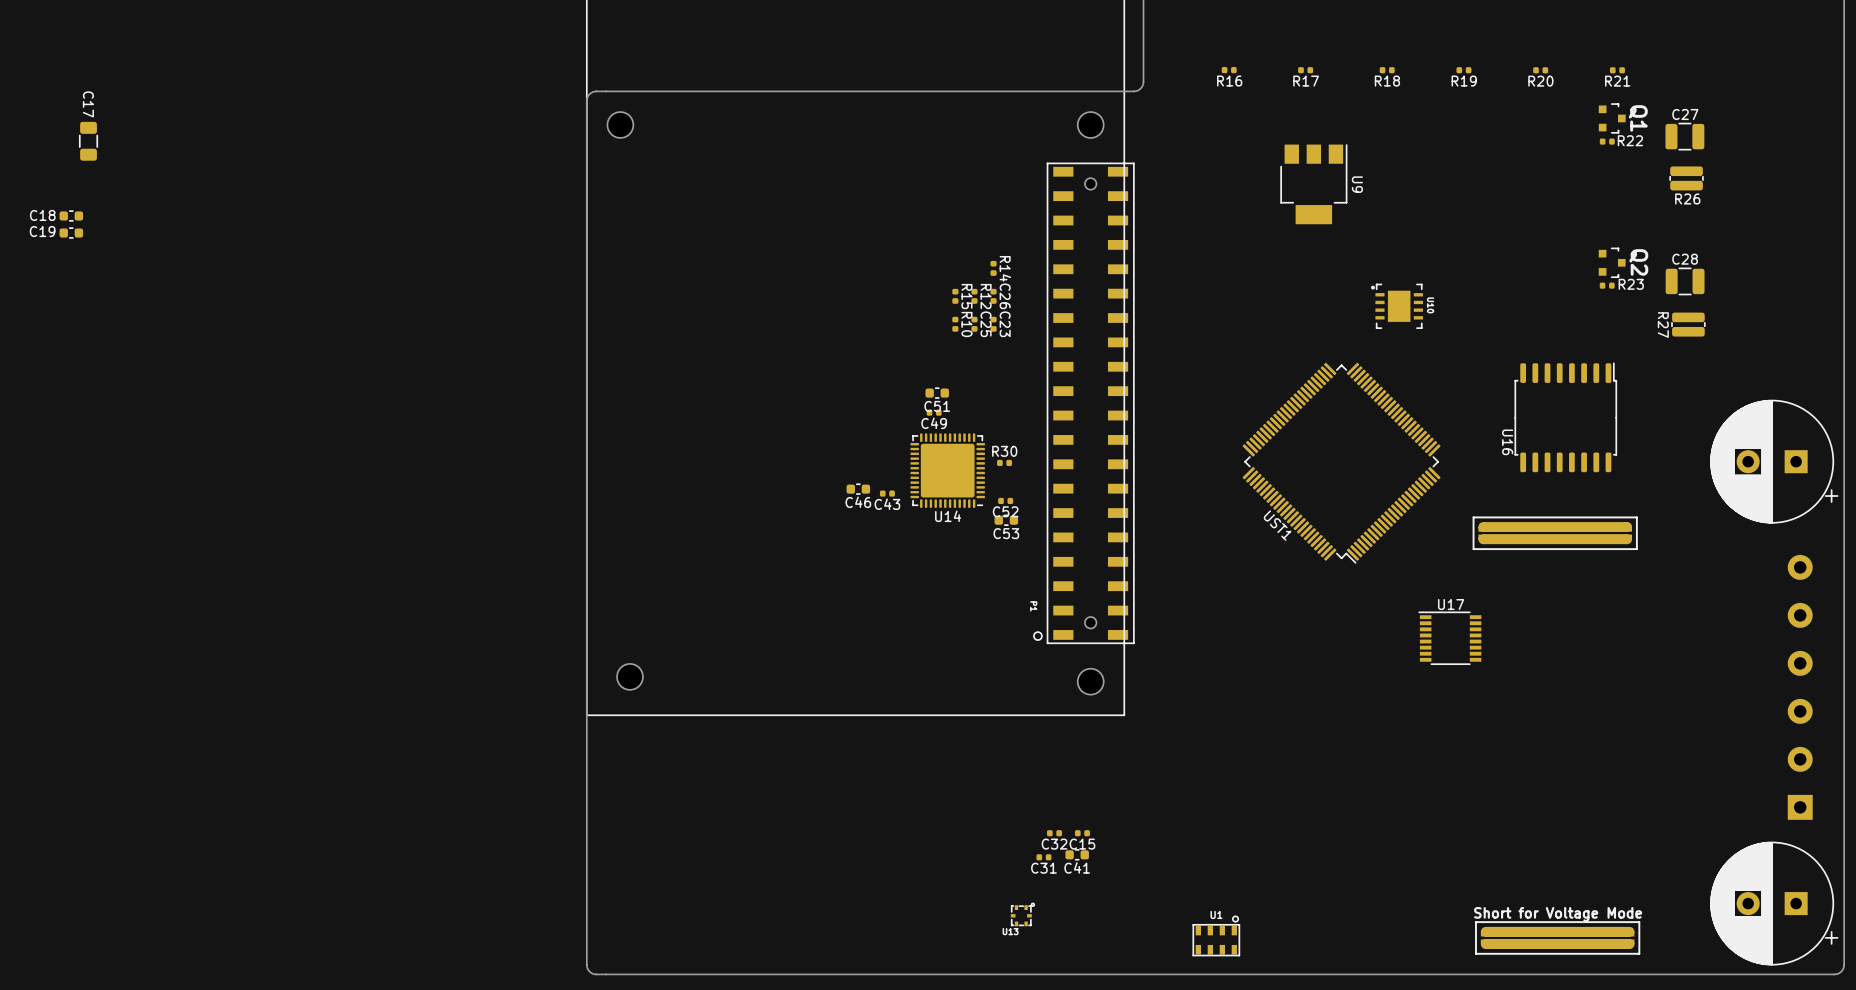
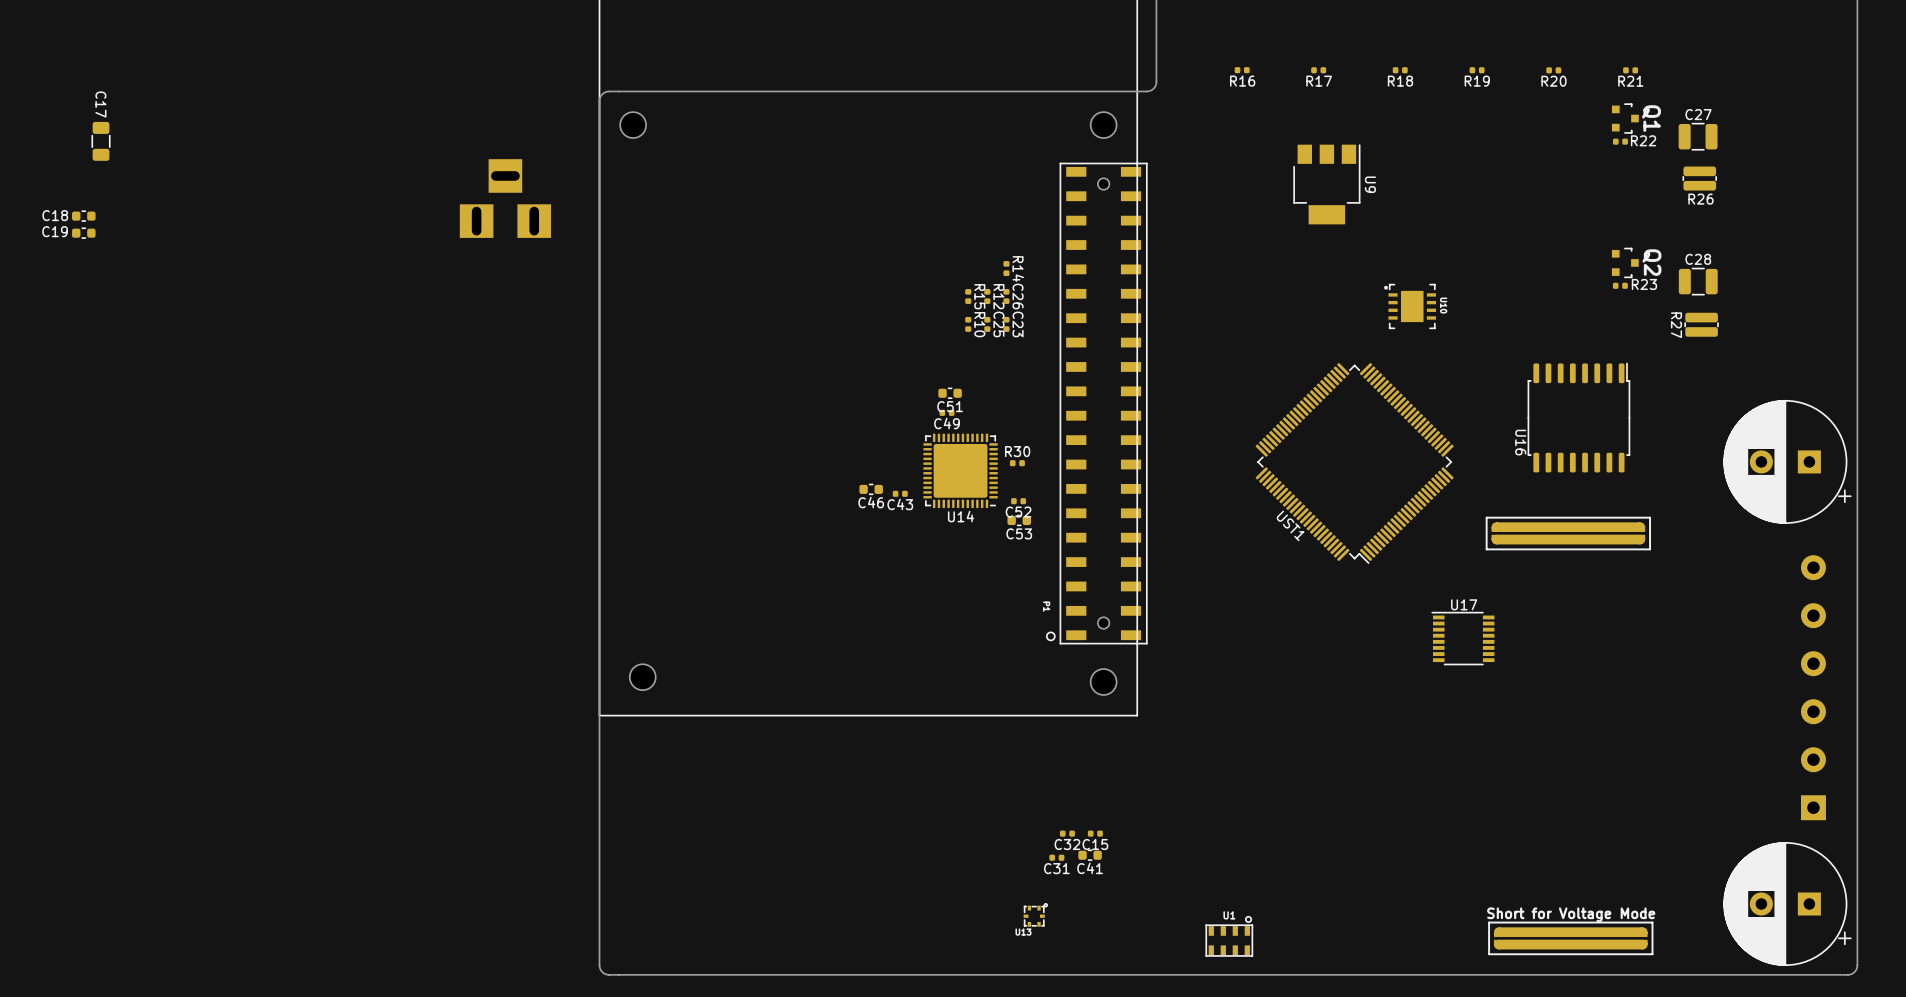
part: none -> (505, 198)

